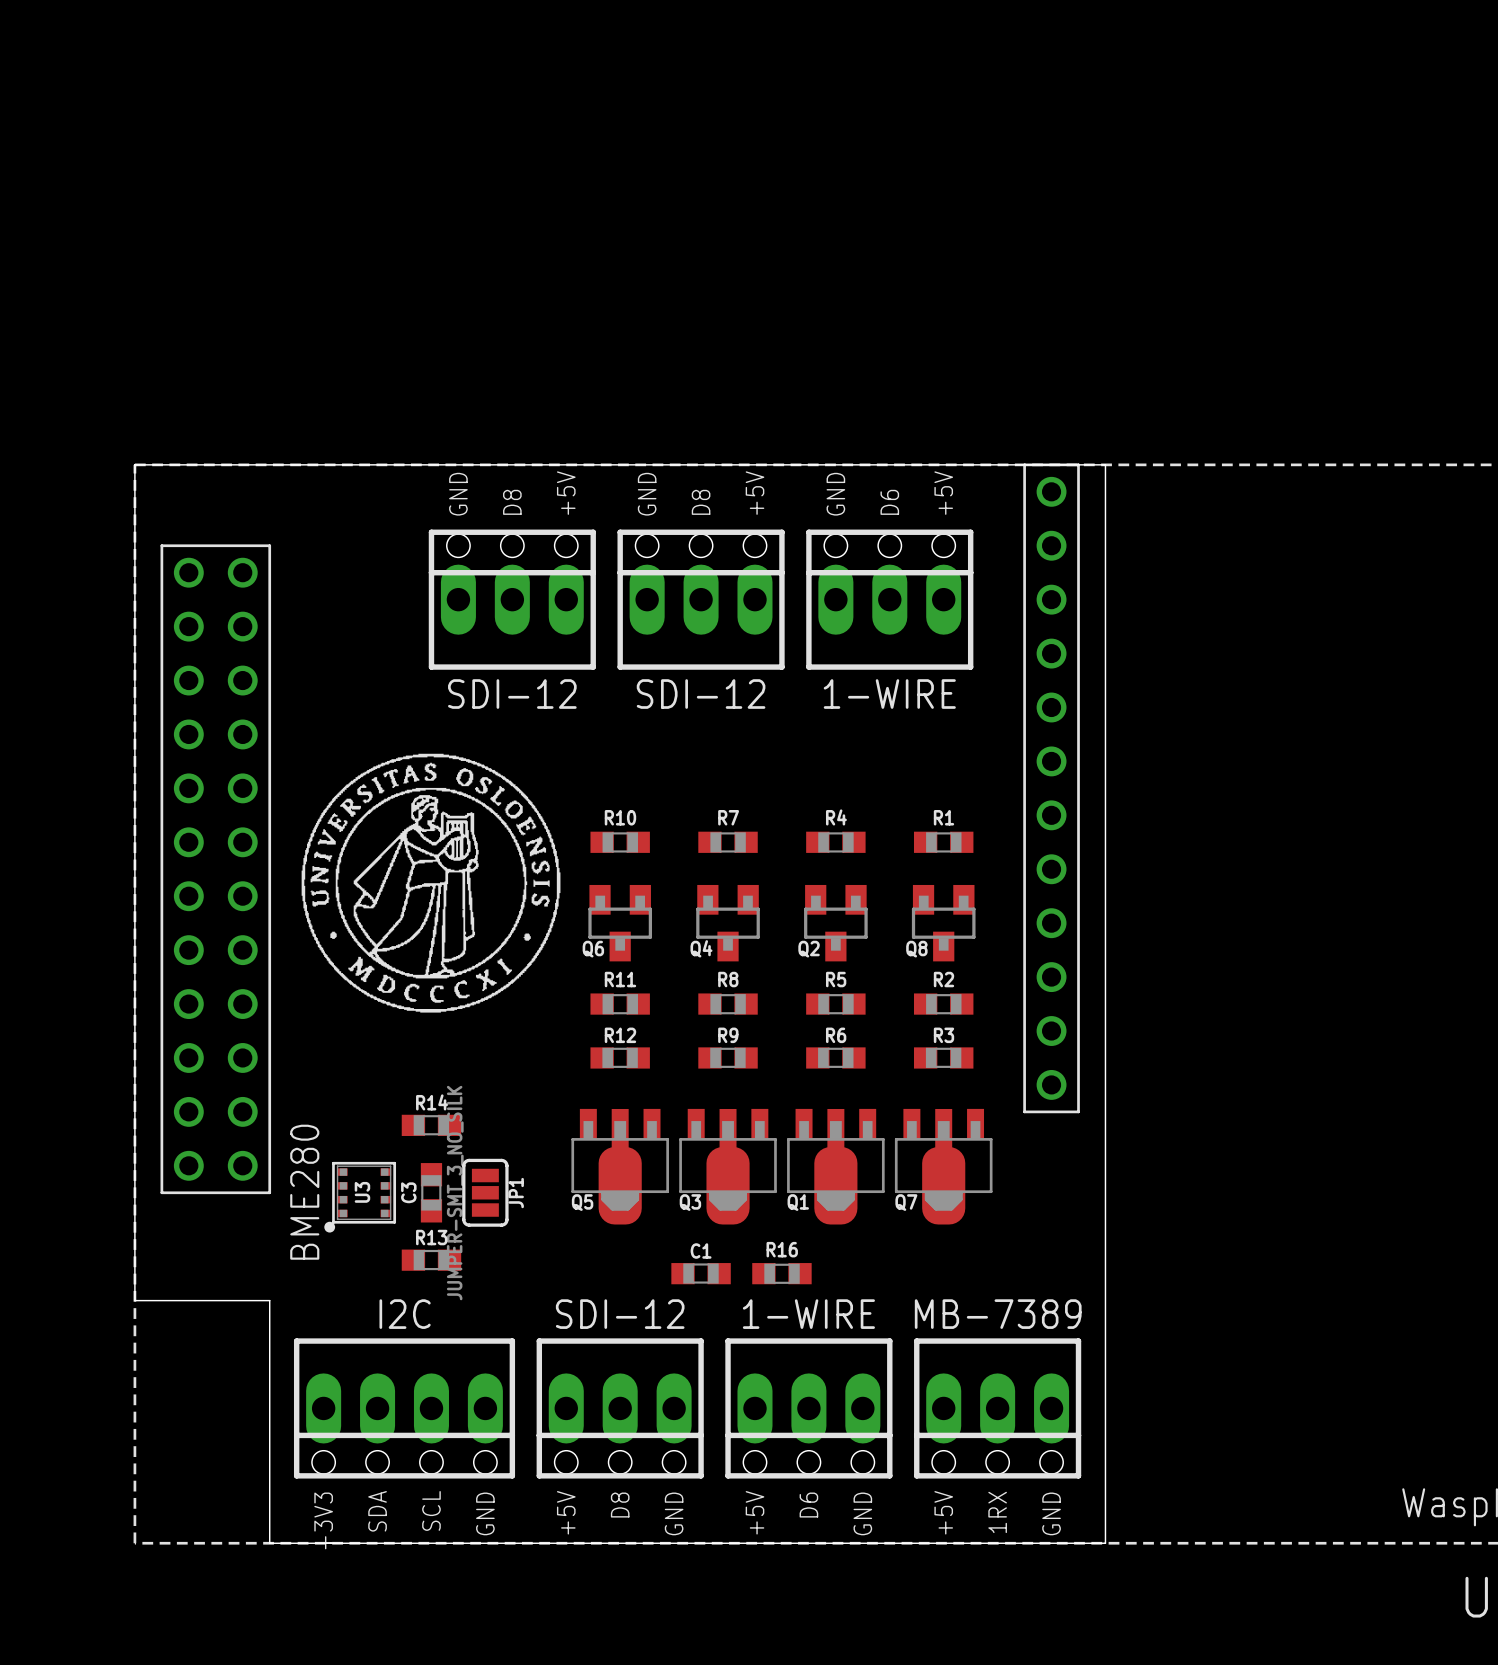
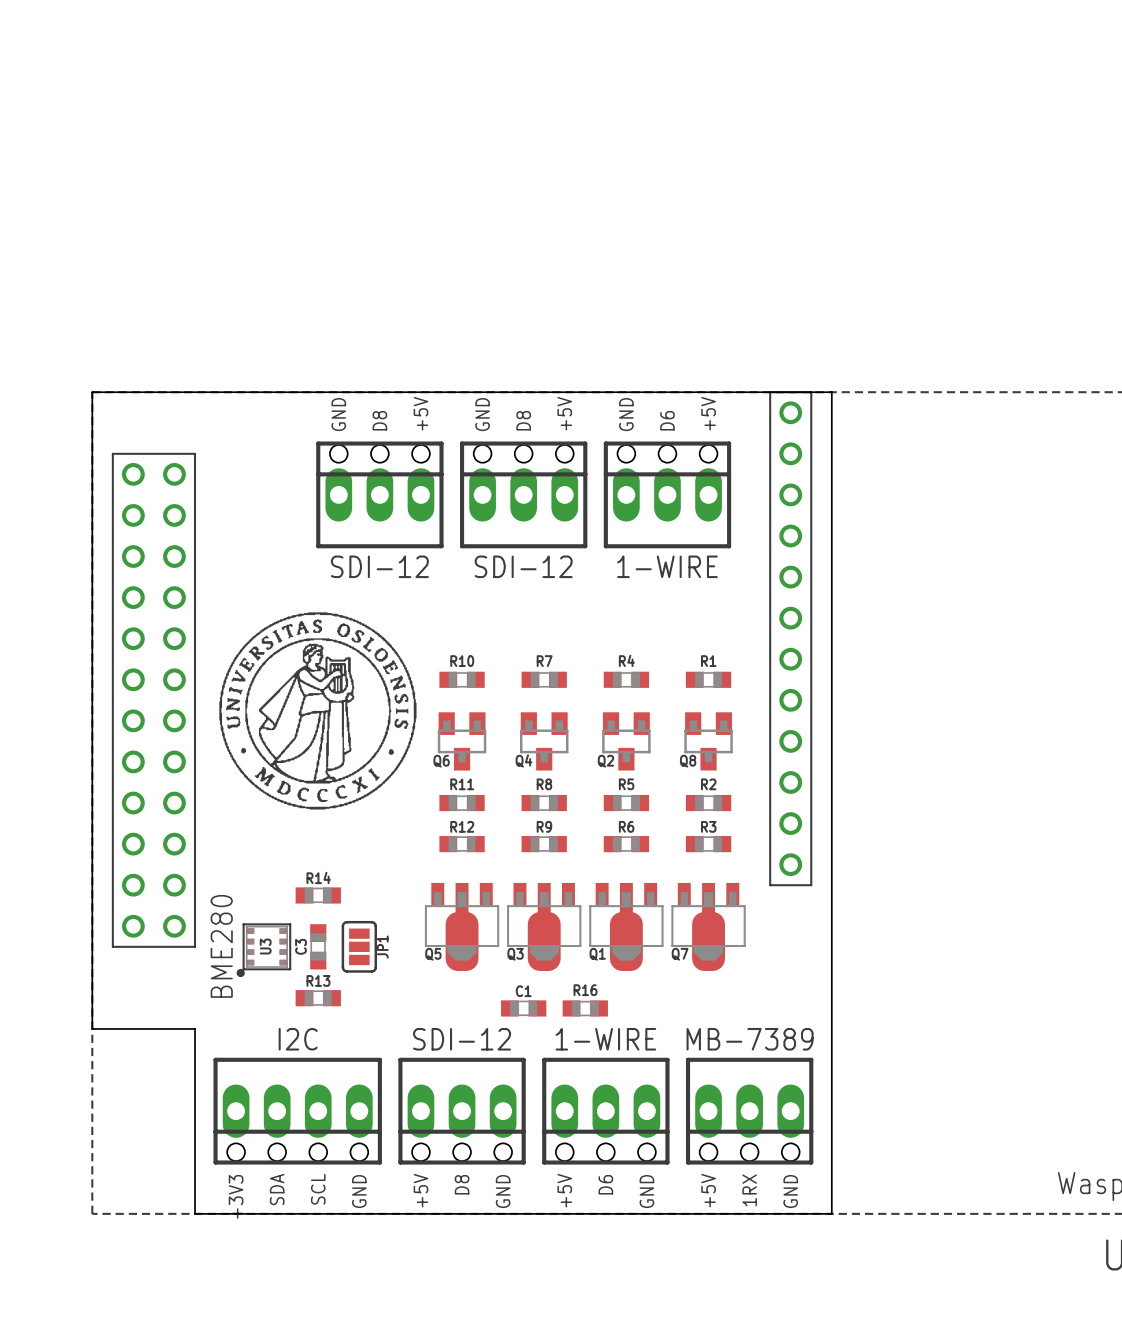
JP1 value: JUMPER-SMT_3_NO_SILK (455, 1193) -> none

